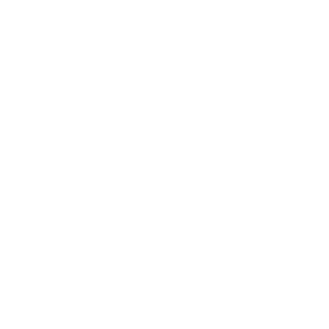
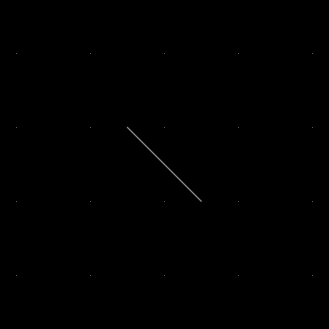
bus: none -> (127, 127) (201, 201)

